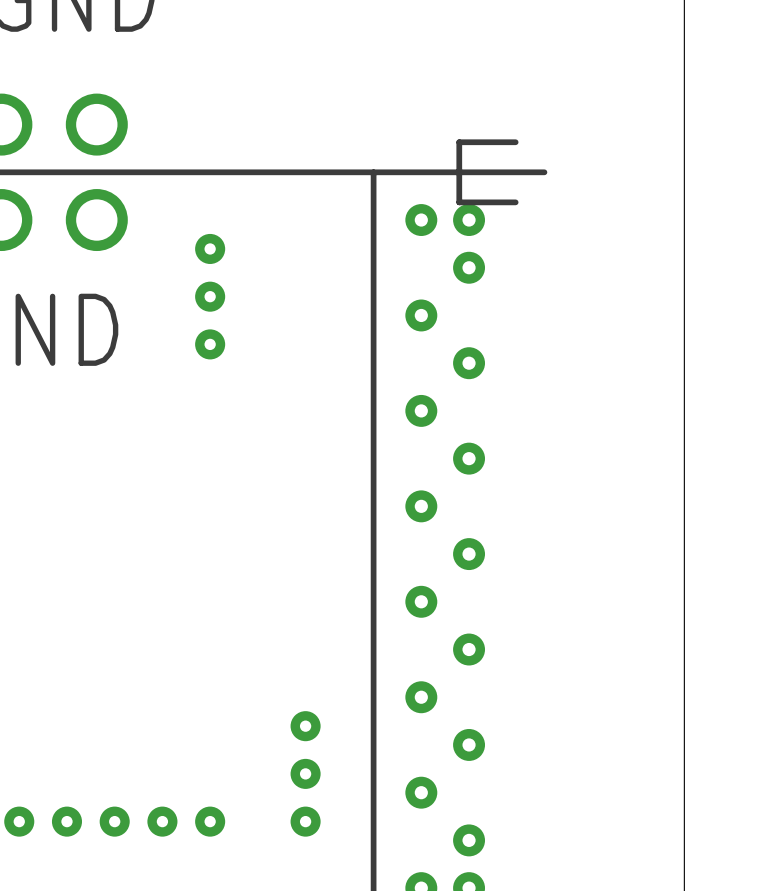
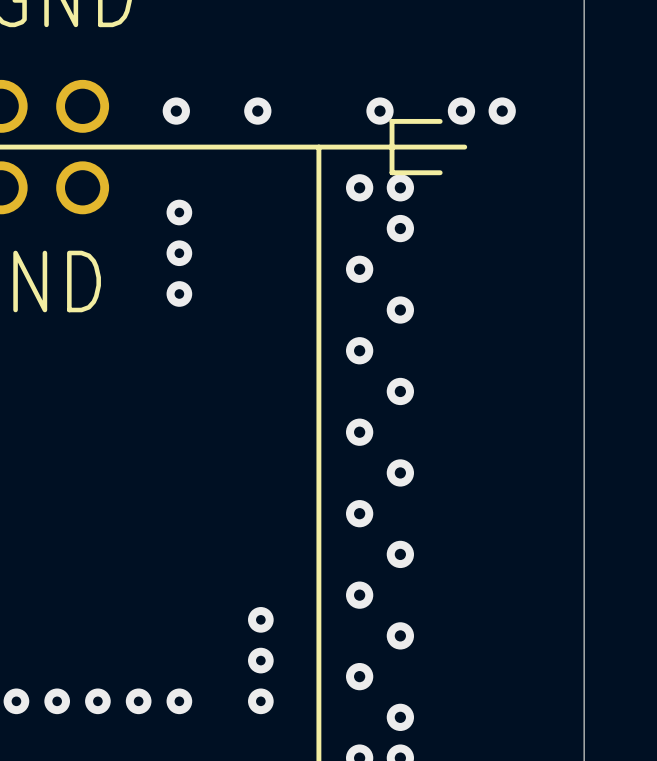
via: none -> (176, 111)
via: none -> (257, 111)
via: none -> (380, 111)
via: none -> (461, 111)
via: none -> (502, 111)

